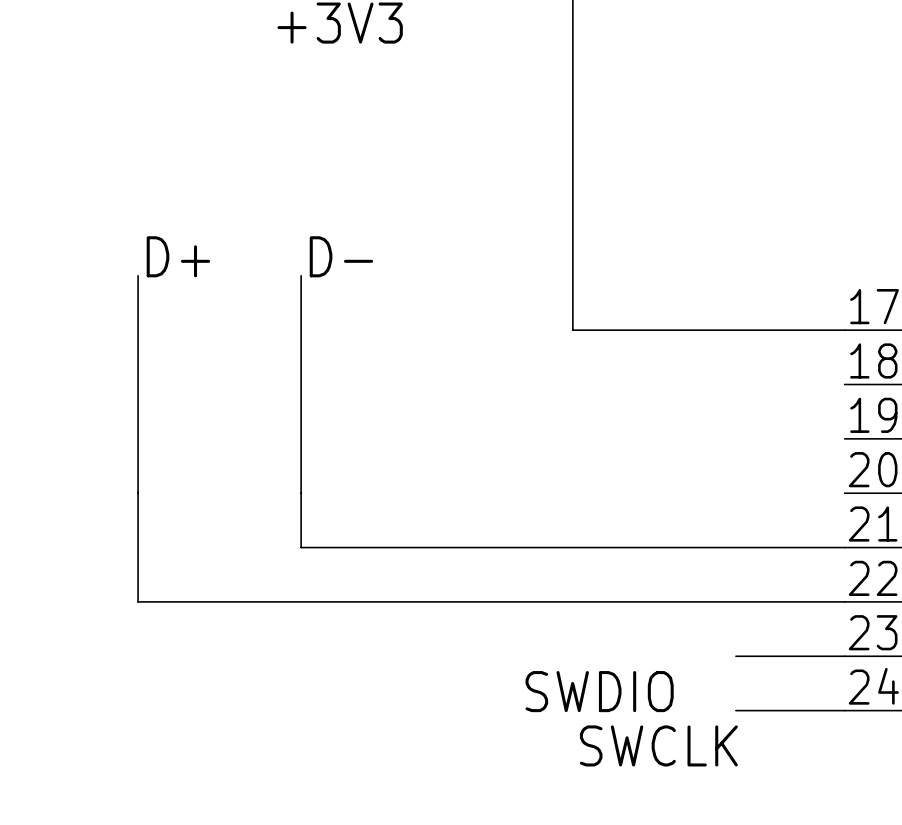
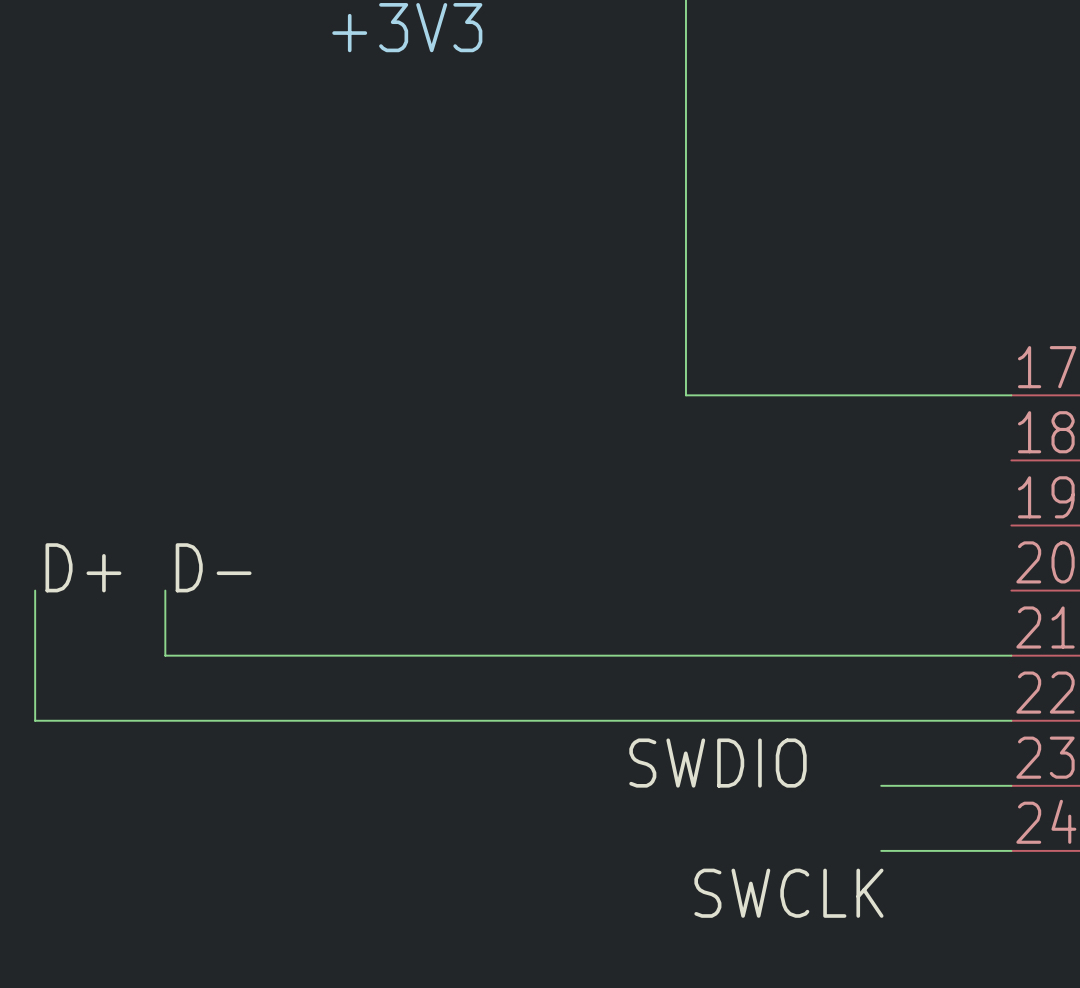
label position: D+ (178, 256) -> D+ (83, 567)
label position: D- (341, 256) -> D- (213, 567)
wire: (138, 275) (138, 493) -> none
wire: (301, 275) (301, 547) -> (165, 655) (360, 655)
wire: (138, 547) (138, 601) -> (35, 590) (35, 720) (165, 720)
label position: SWDIO (599, 691) -> SWDIO (717, 763)

